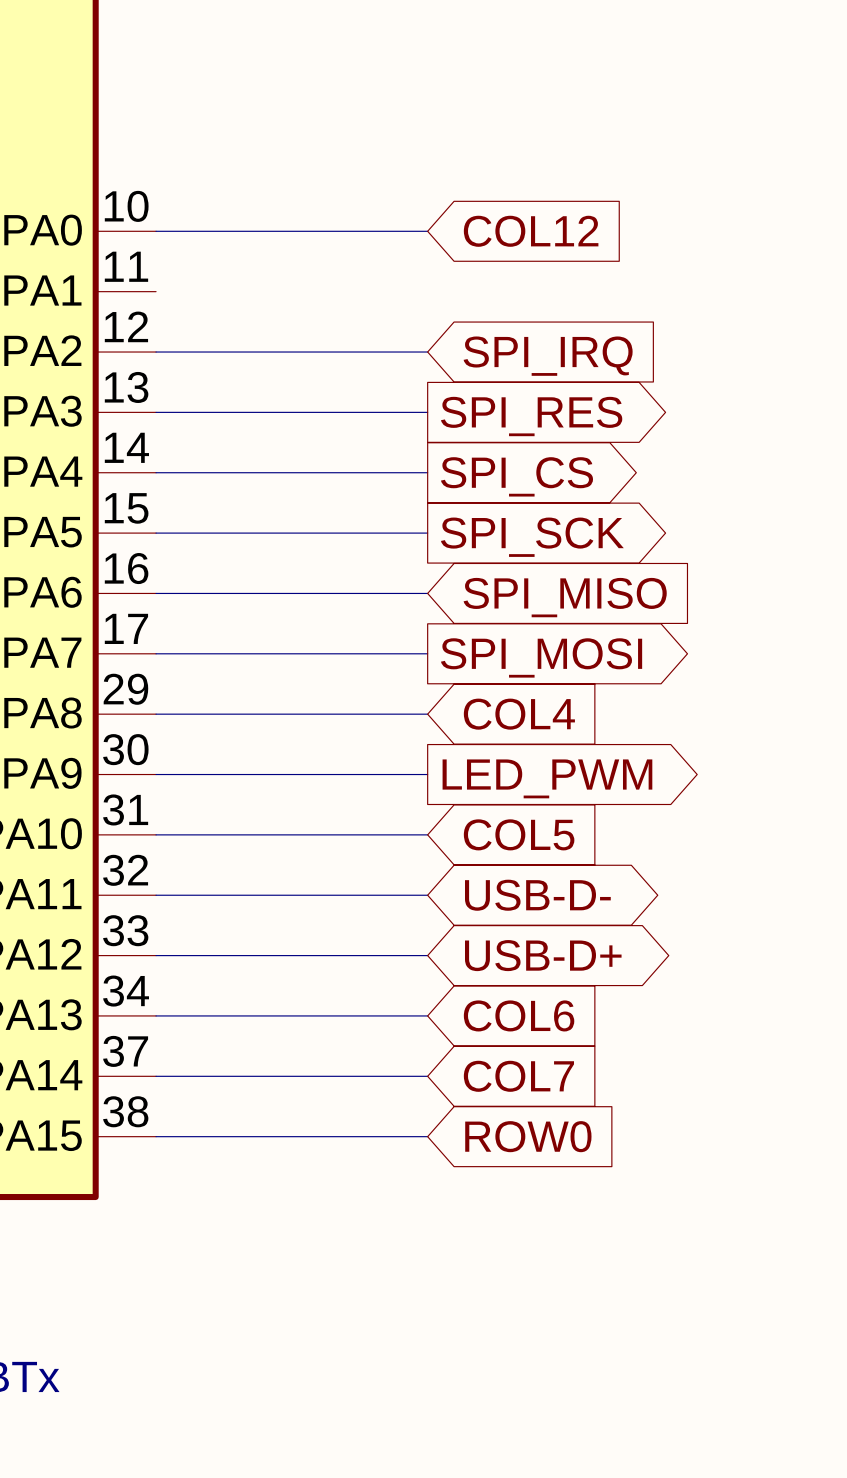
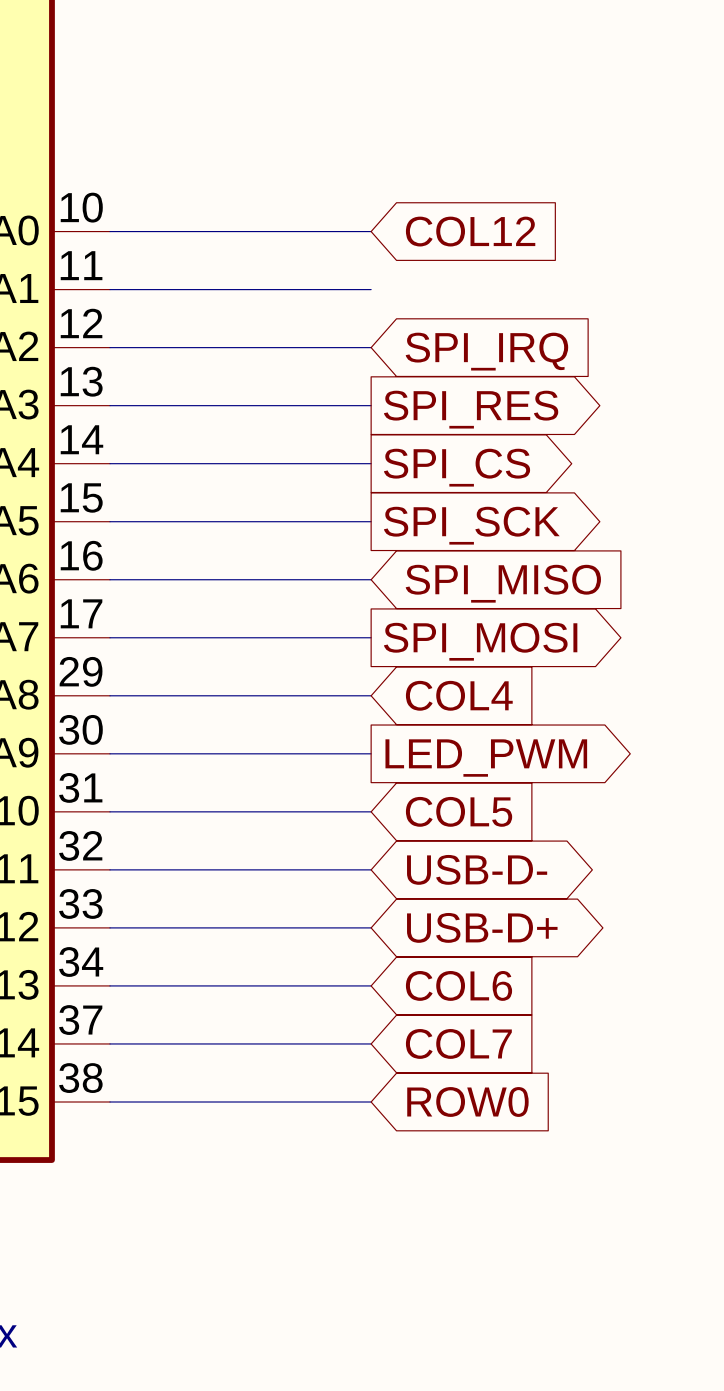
wire: none -> (110, 289) (371, 289)

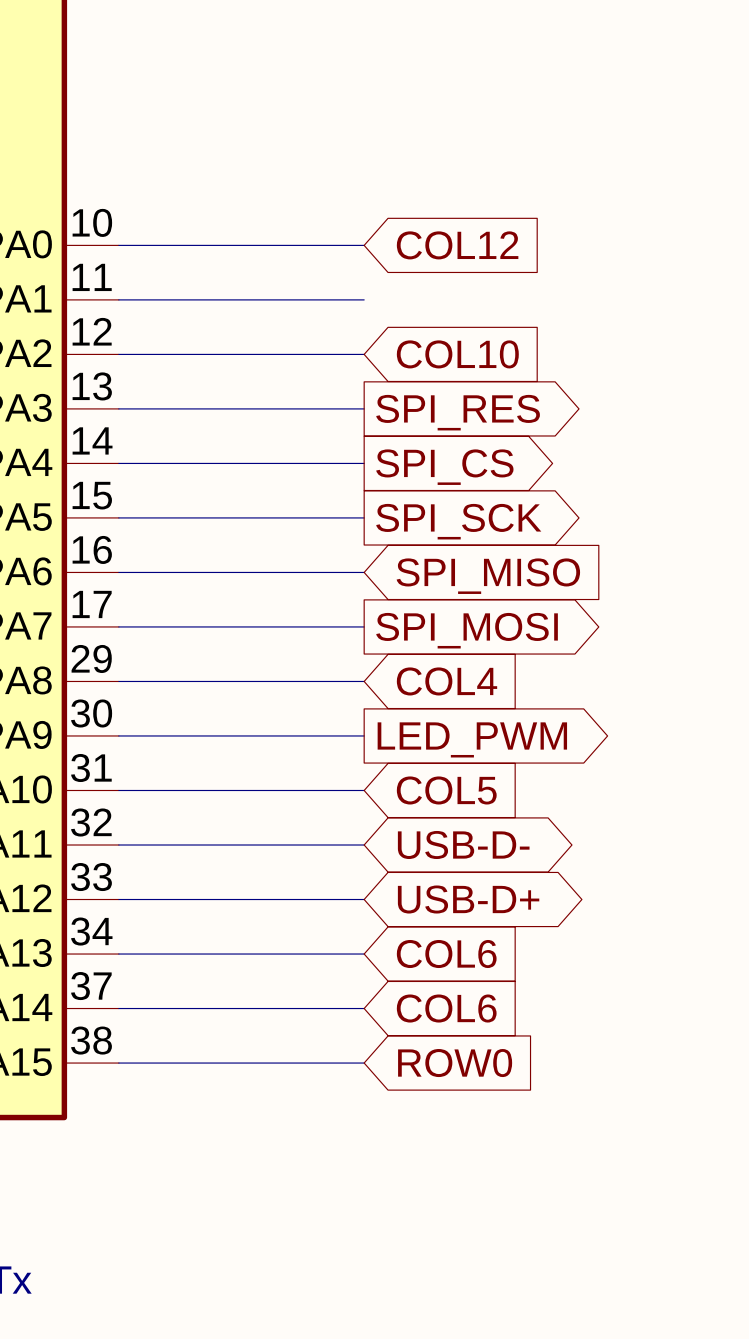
global label: SPI_IRQ (486, 351) -> COL10 (457, 354)
global label: COL7 (458, 1043) -> COL6 (446, 1008)

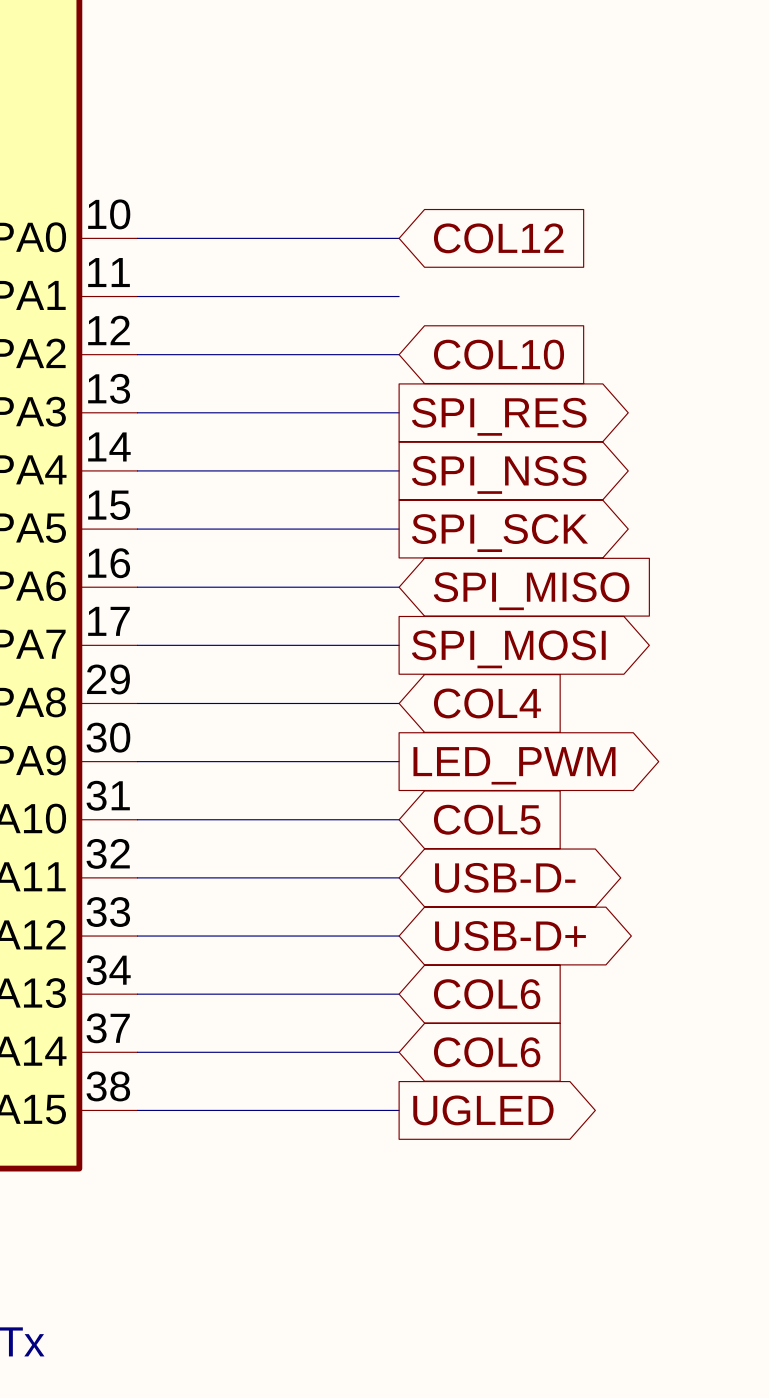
global label: SPI_CS (444, 467) -> SPI_NSS (499, 474)
global label shape: input (455, 1063) -> output (483, 1110)
global label: ROW0 (455, 1063) -> UGLED (483, 1110)

